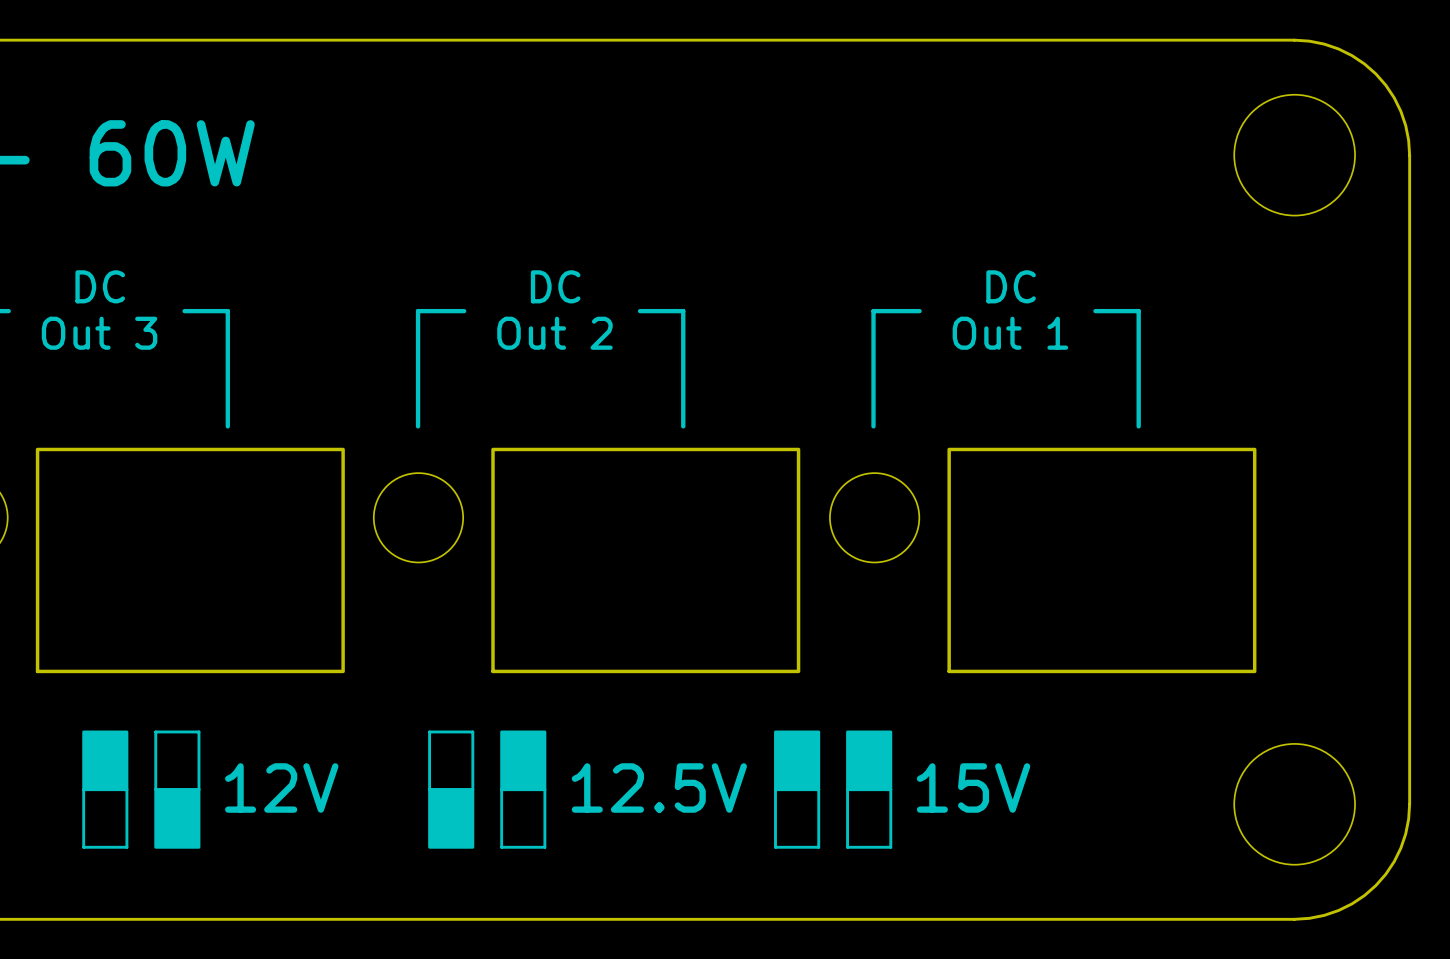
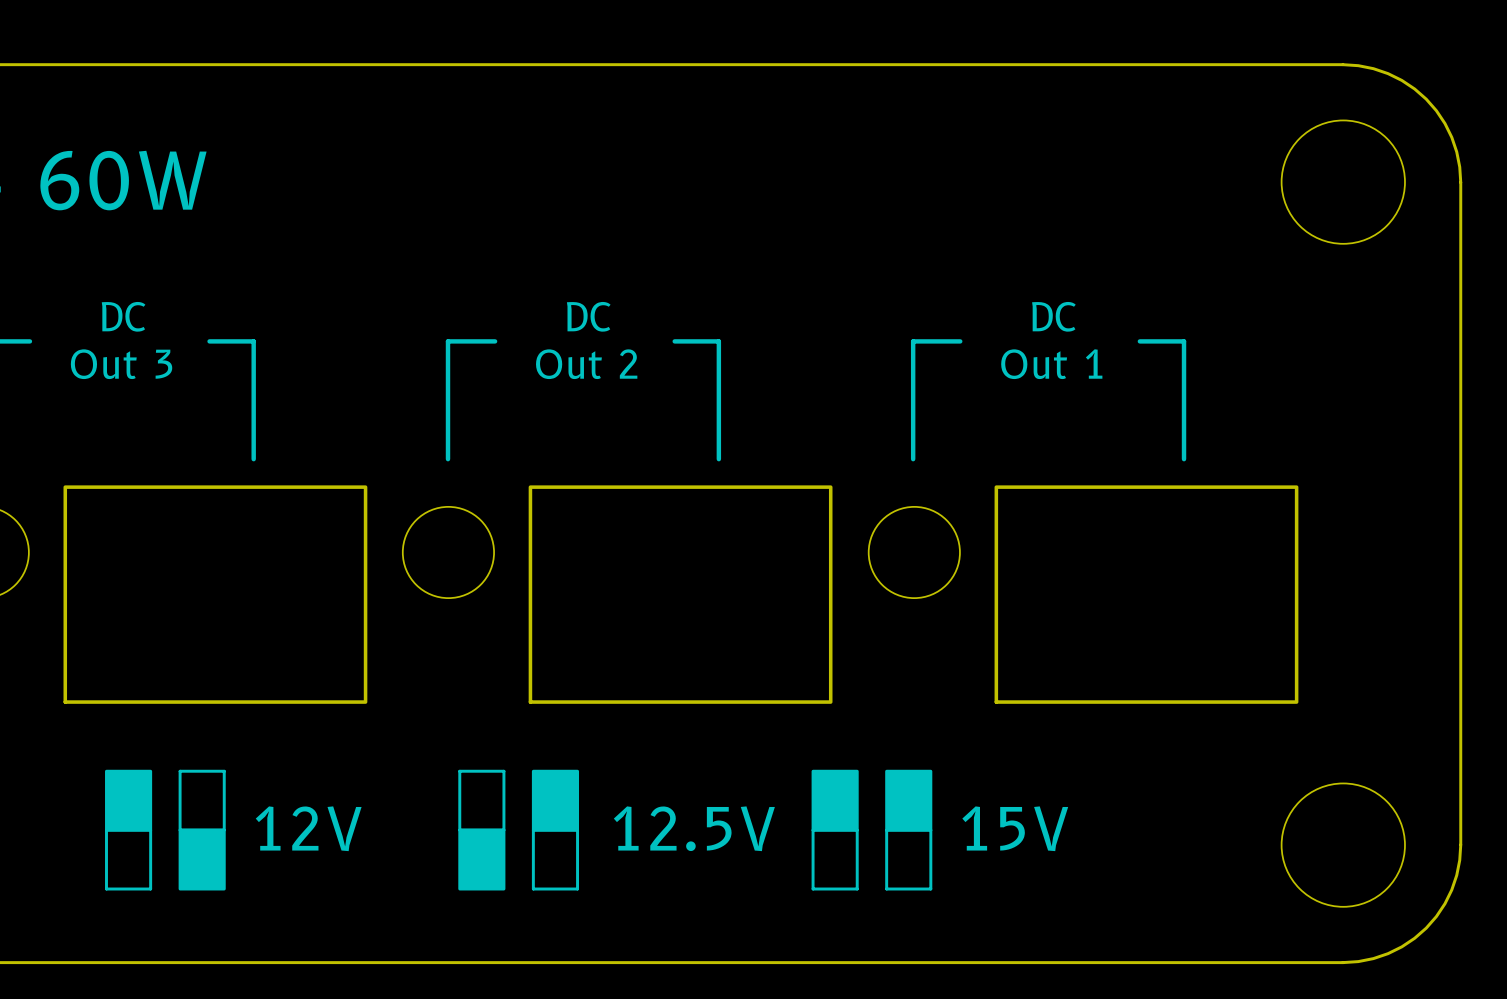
drawing shape: [35, 447, 345, 674] -> [63, 485, 368, 704]
drawing shape: [491, 447, 801, 674] -> [528, 485, 833, 704]
drawing shape: [947, 447, 1257, 674] -> [994, 485, 1299, 704]

